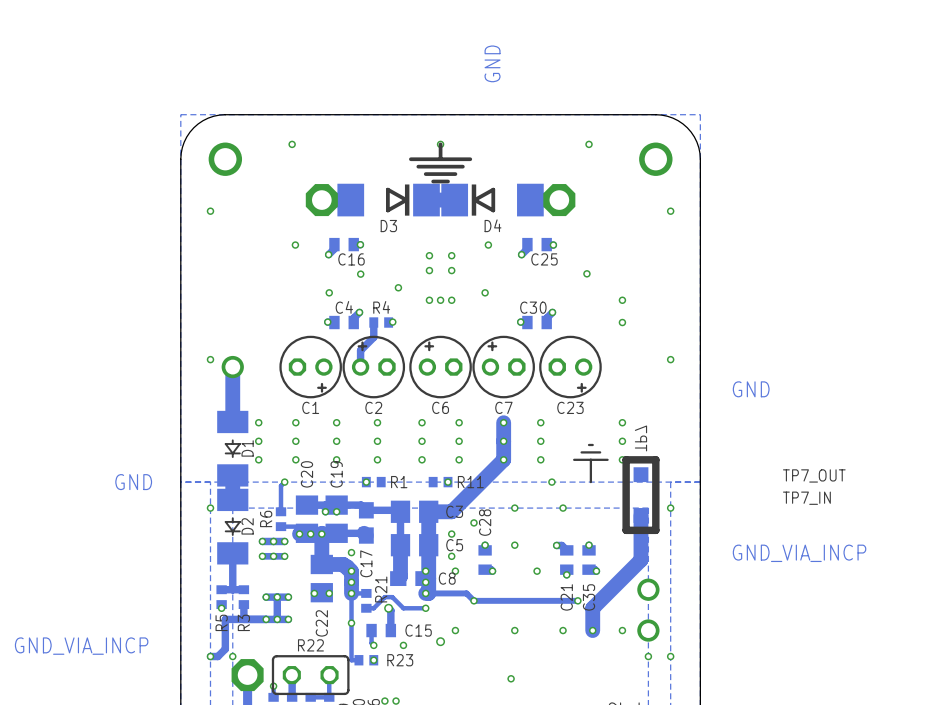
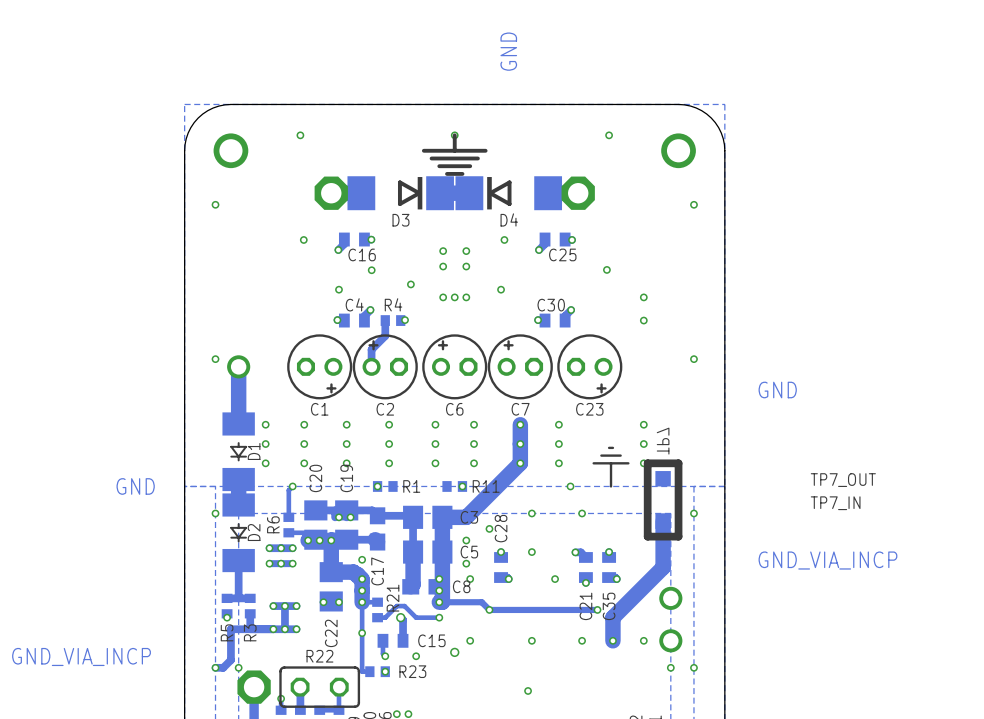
via: (325, 511) -> none
via: none -> (338, 517)
via: (336, 511) -> none
via: none -> (350, 517)

